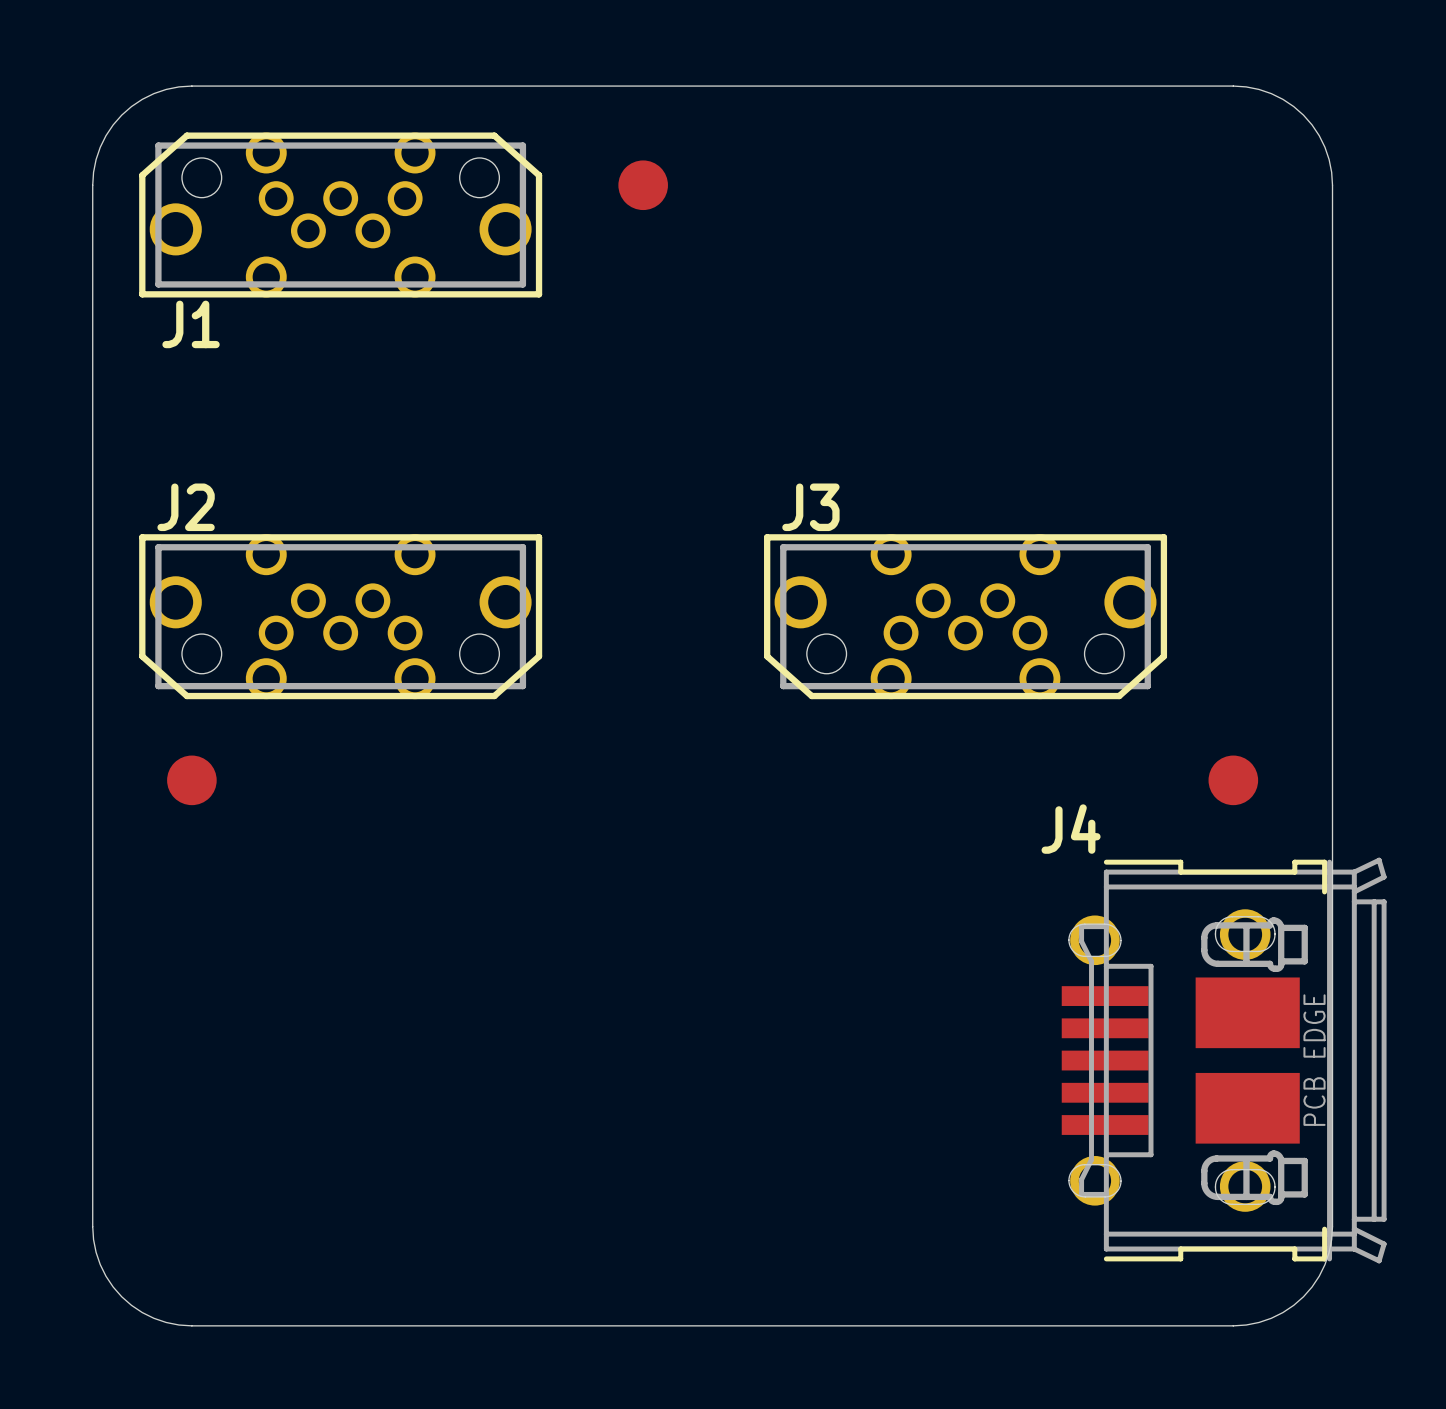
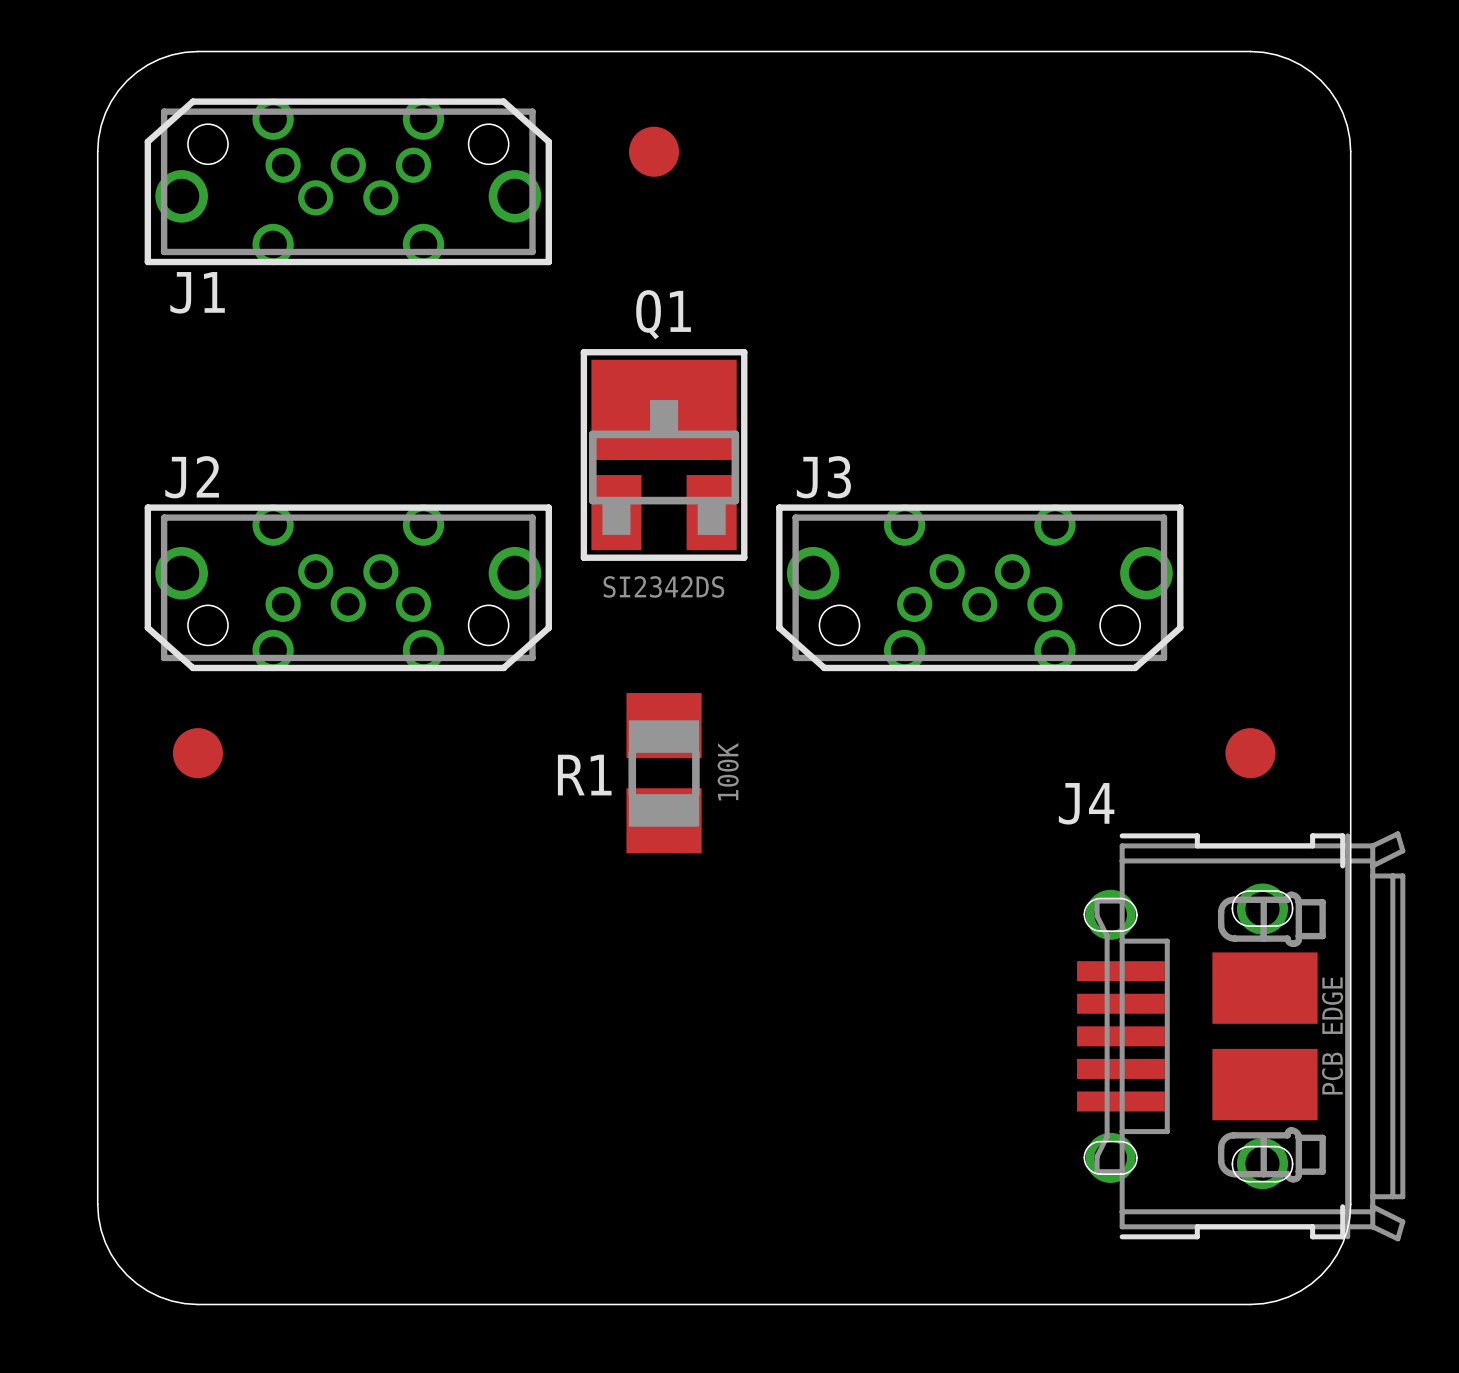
Q1: none -> SI2342DS (664, 454)
R1: none -> 100K (664, 773)

